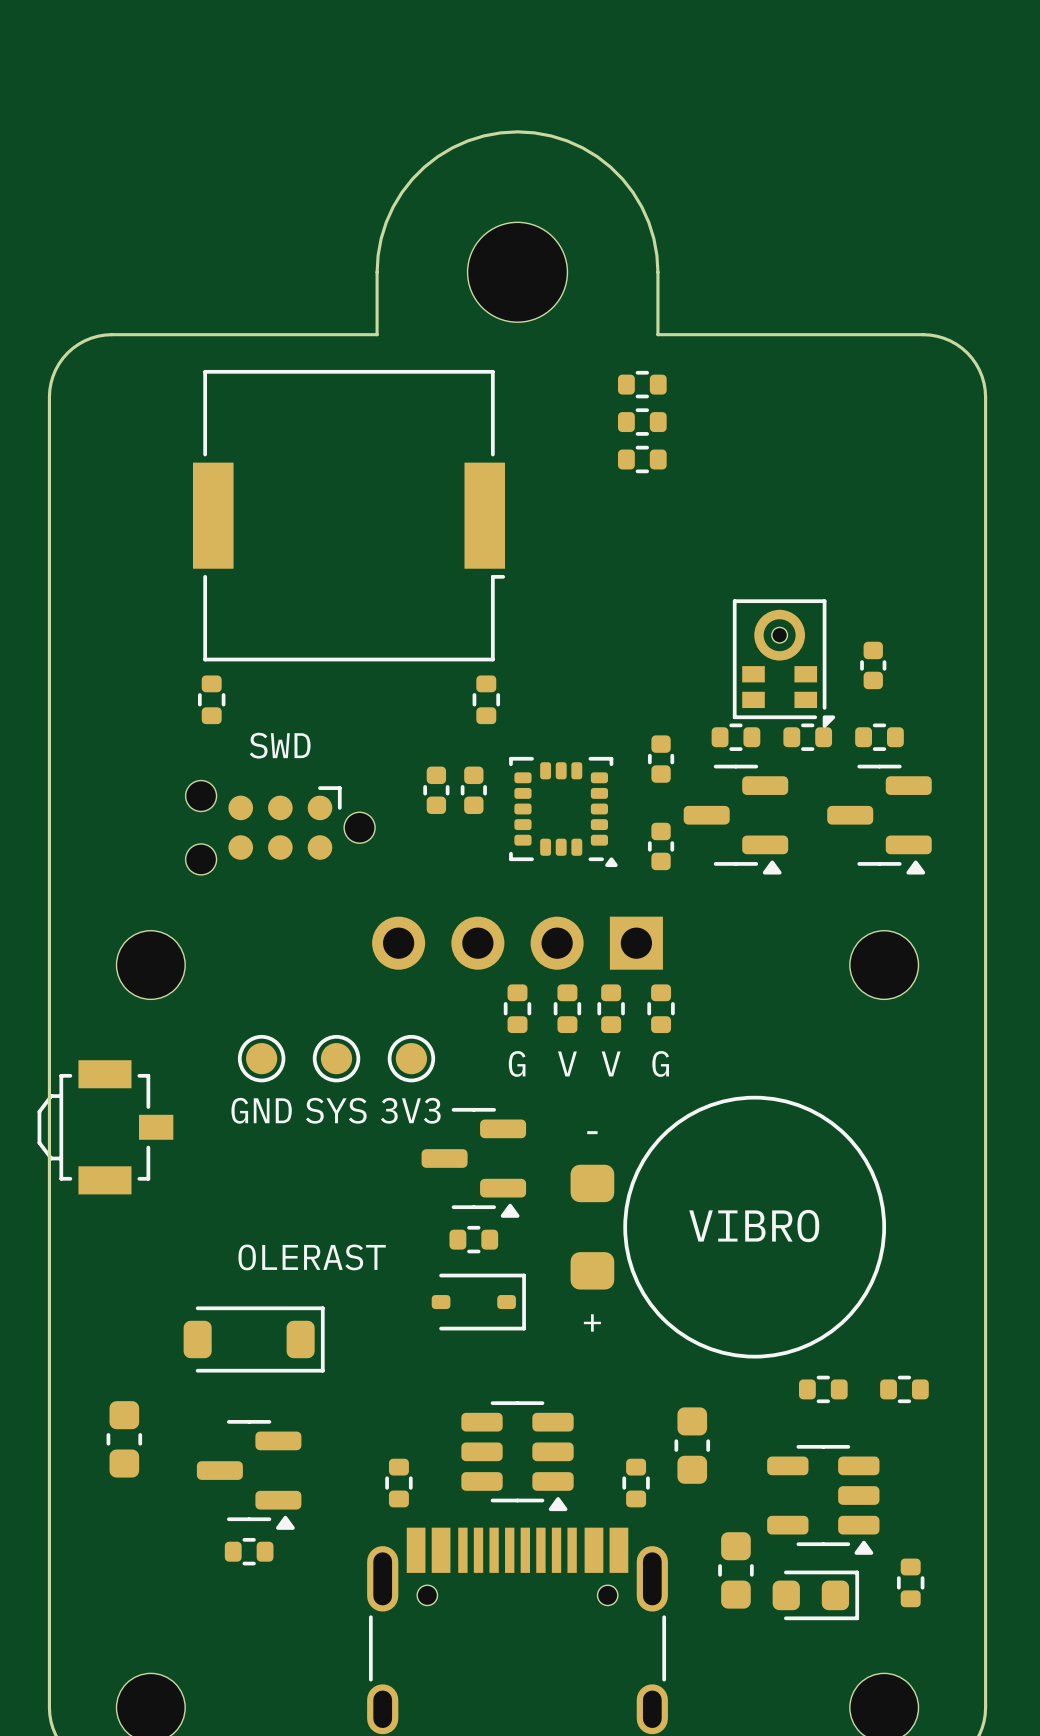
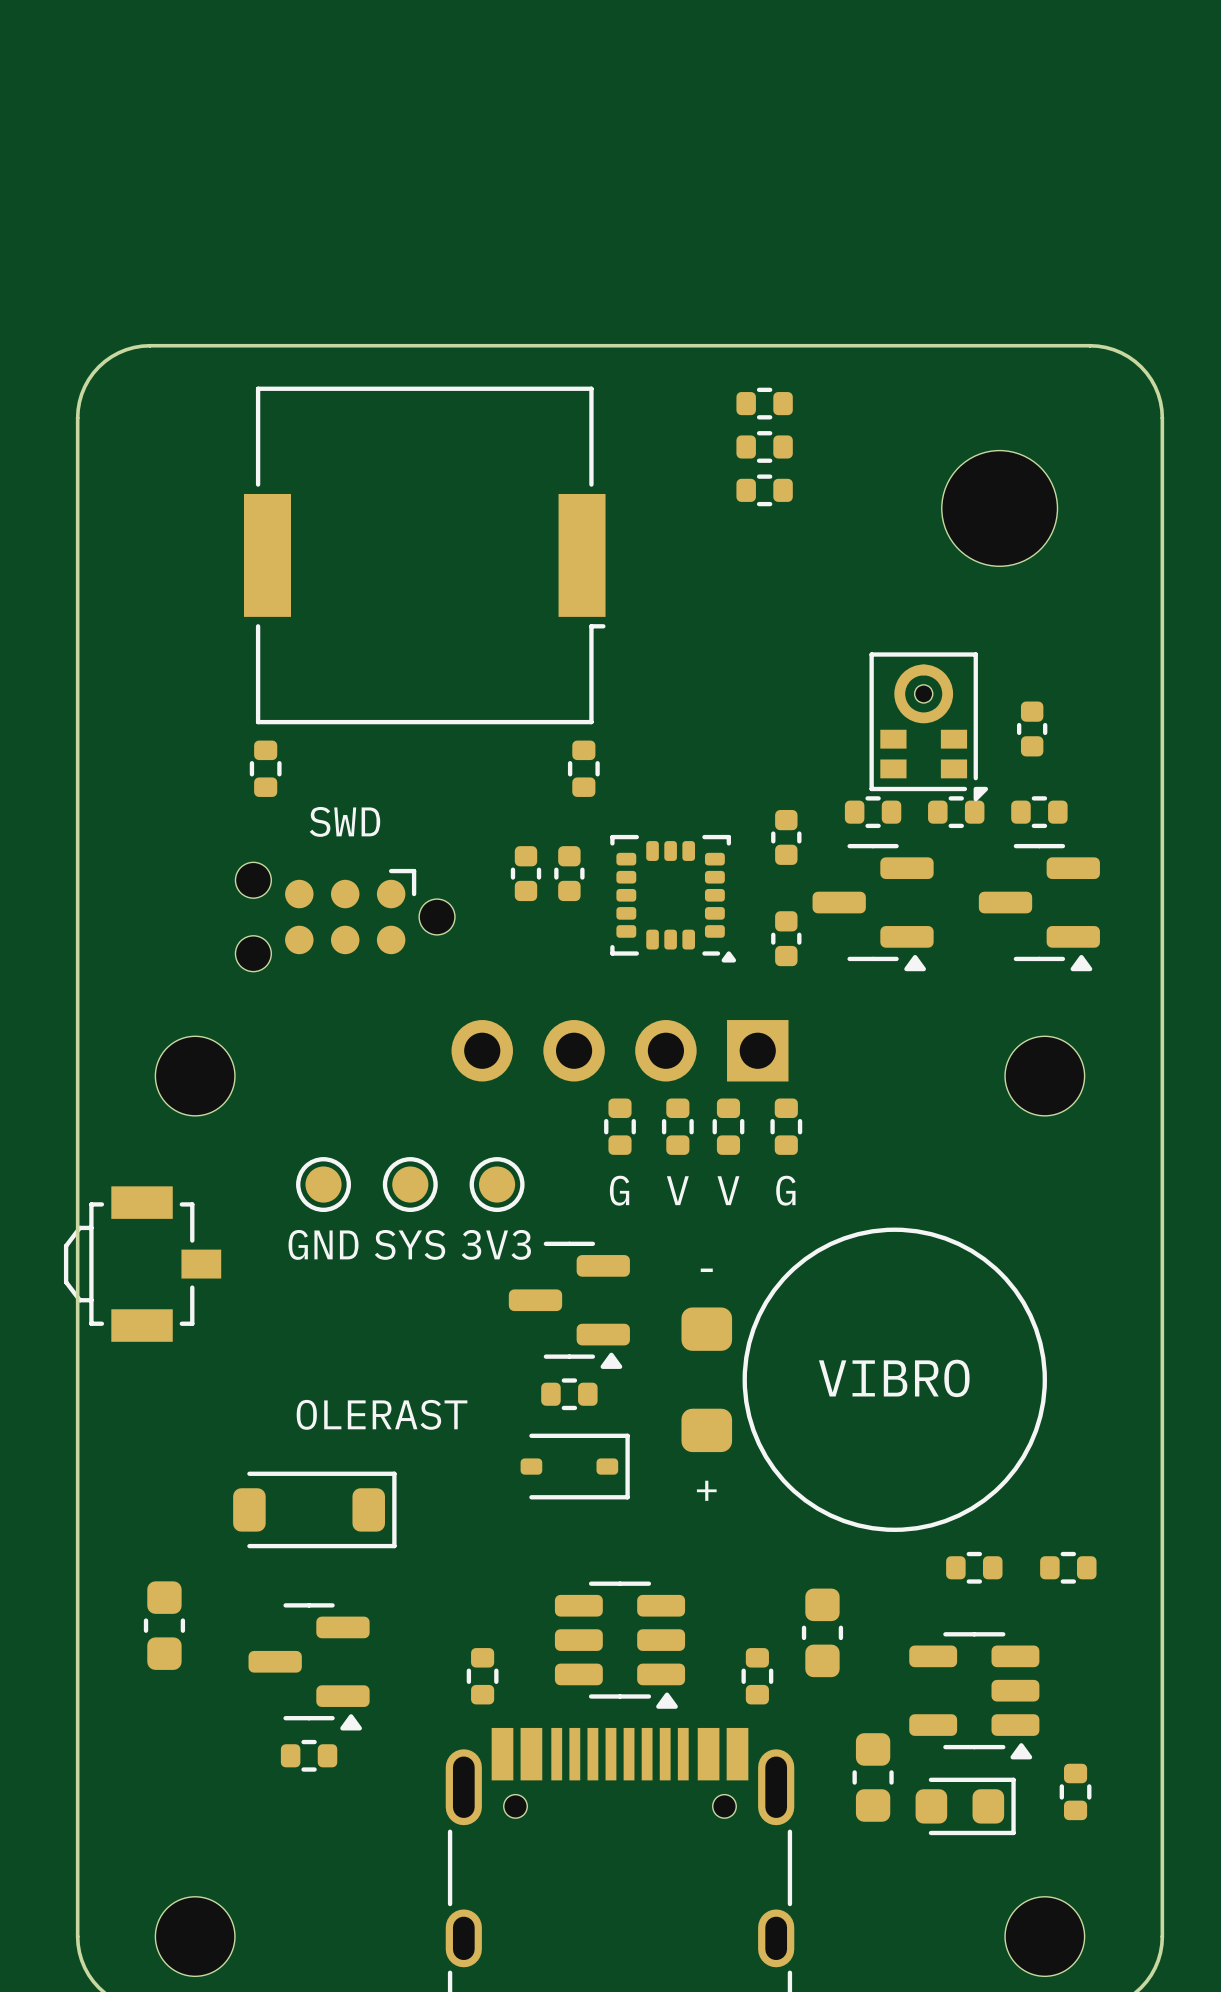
part position: (517, 272) -> (999, 508)
board edge: (657, 334) (656, 255) (648, 222) (633, 192) (610, 167) (582, 147) (551, 135) (517, 131) (483, 135) (452, 147) (424, 167) (401, 192) (386, 222) (378, 255) (377, 334) -> (782, 345) (457, 345)

